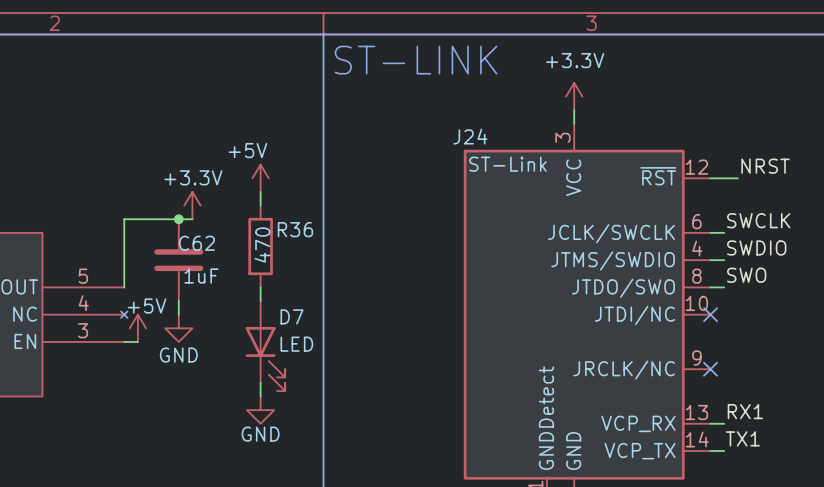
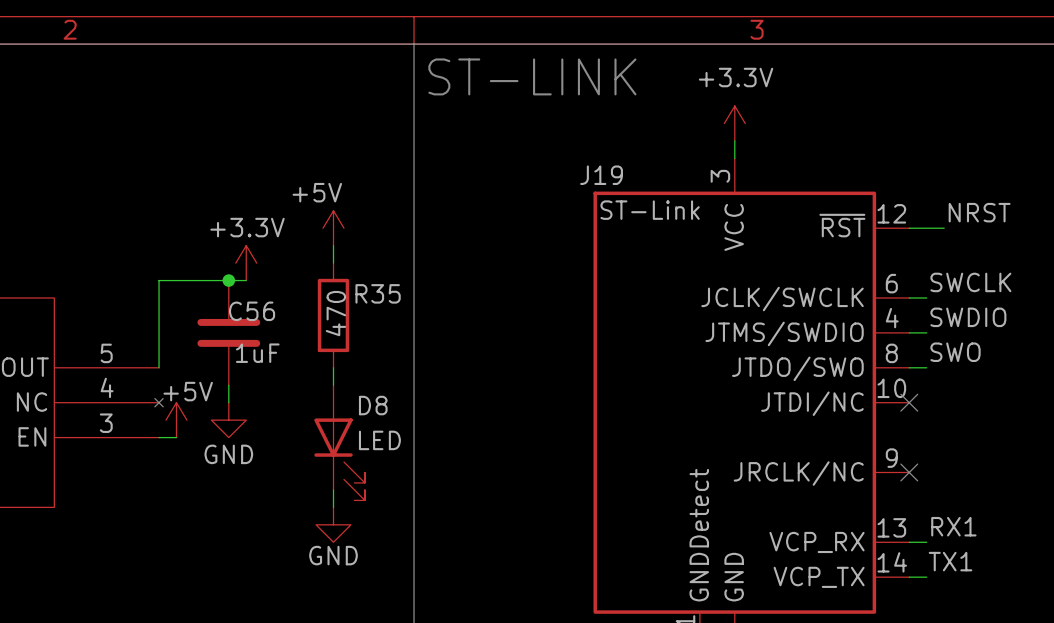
J24 name: J24 (470, 136) -> J19 (601, 175)
R36 name: R36 (295, 229) -> R35 (378, 293)
C62 name: C62 (196, 243) -> C56 (252, 311)
D7 name: D7 (292, 316) -> D8 (373, 405)

